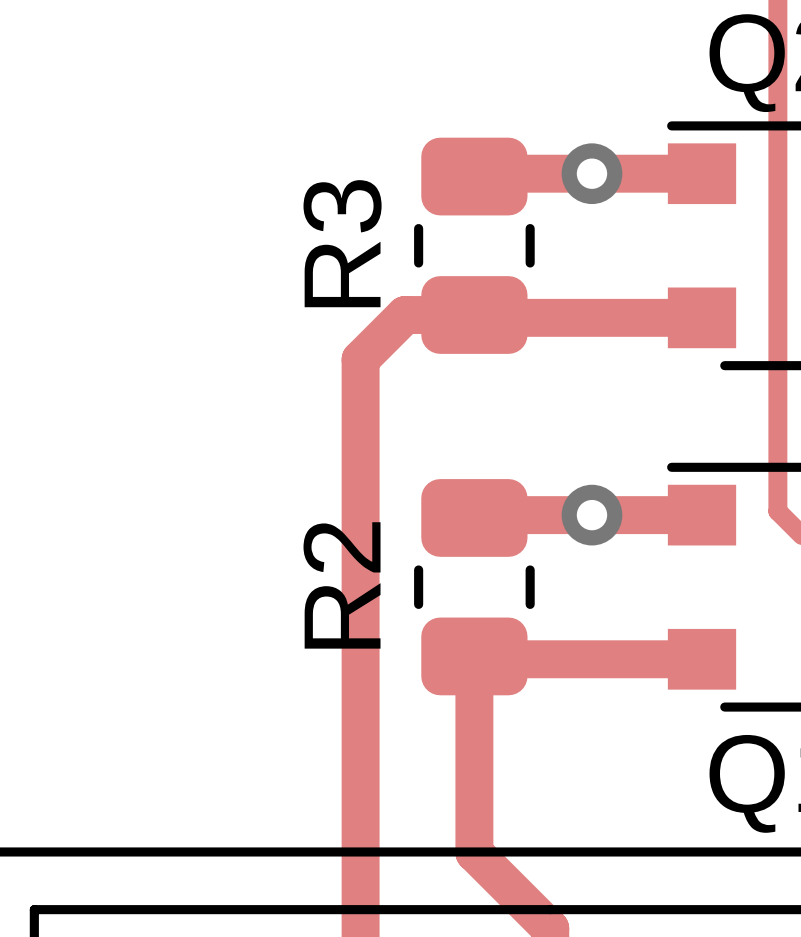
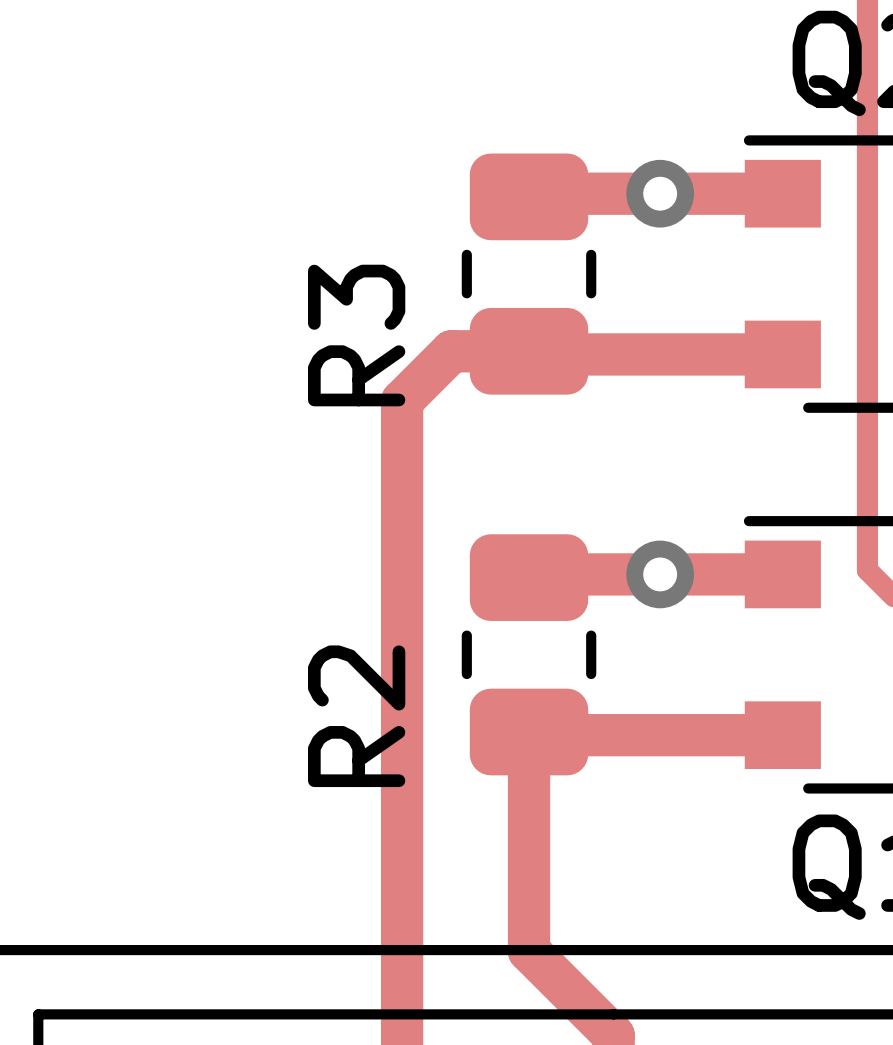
R3 name position: R3 (342, 243) -> R3 (356, 335)
R2 name position: R2 (342, 585) -> R2 (356, 716)

